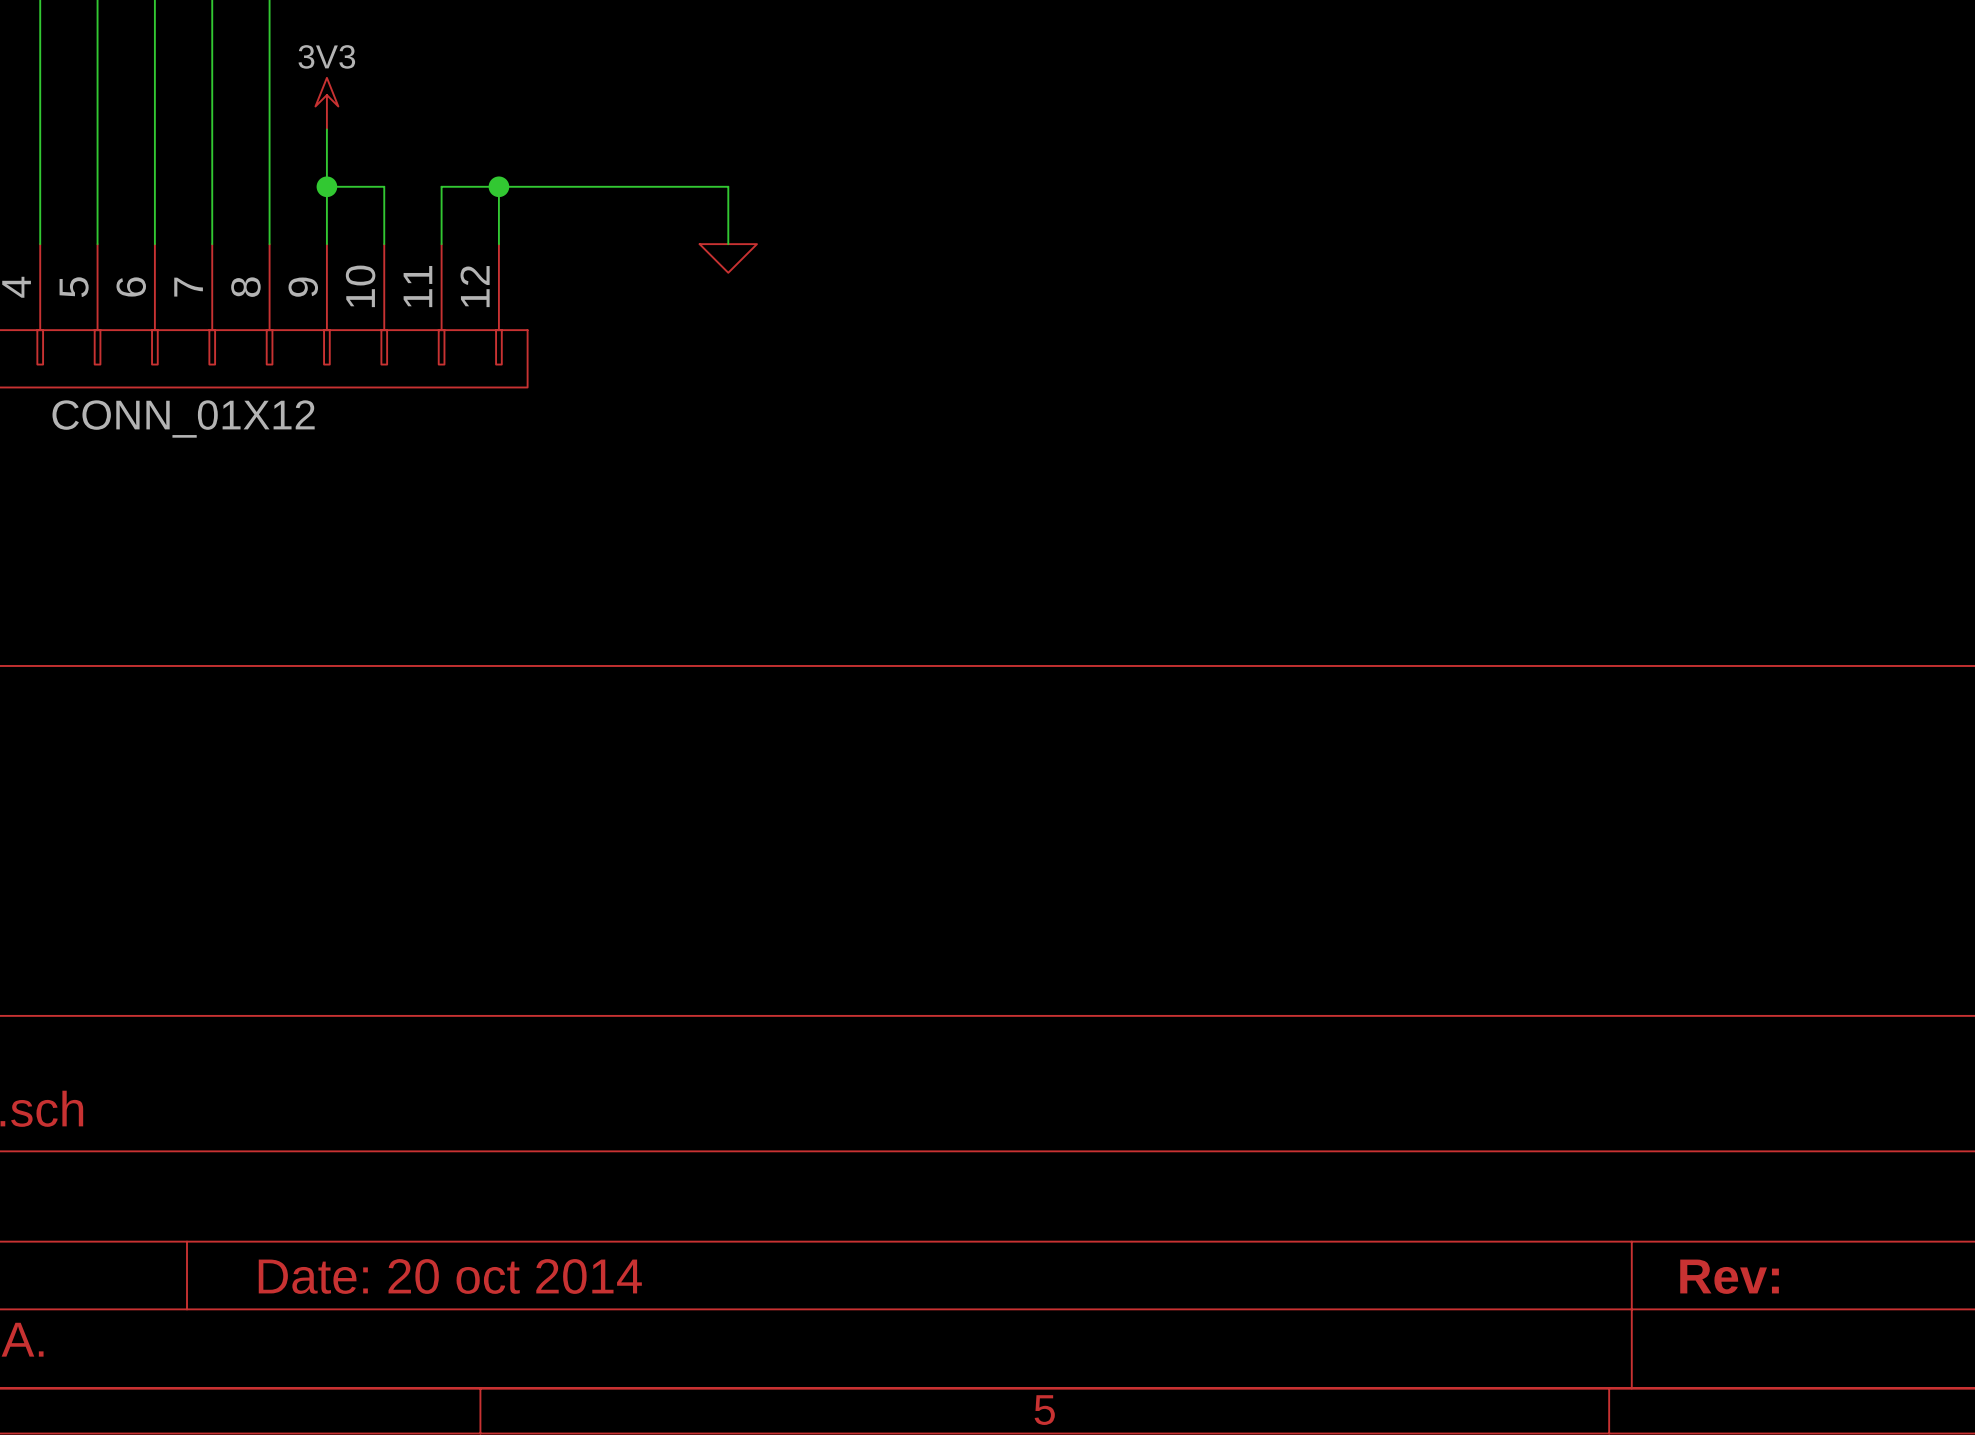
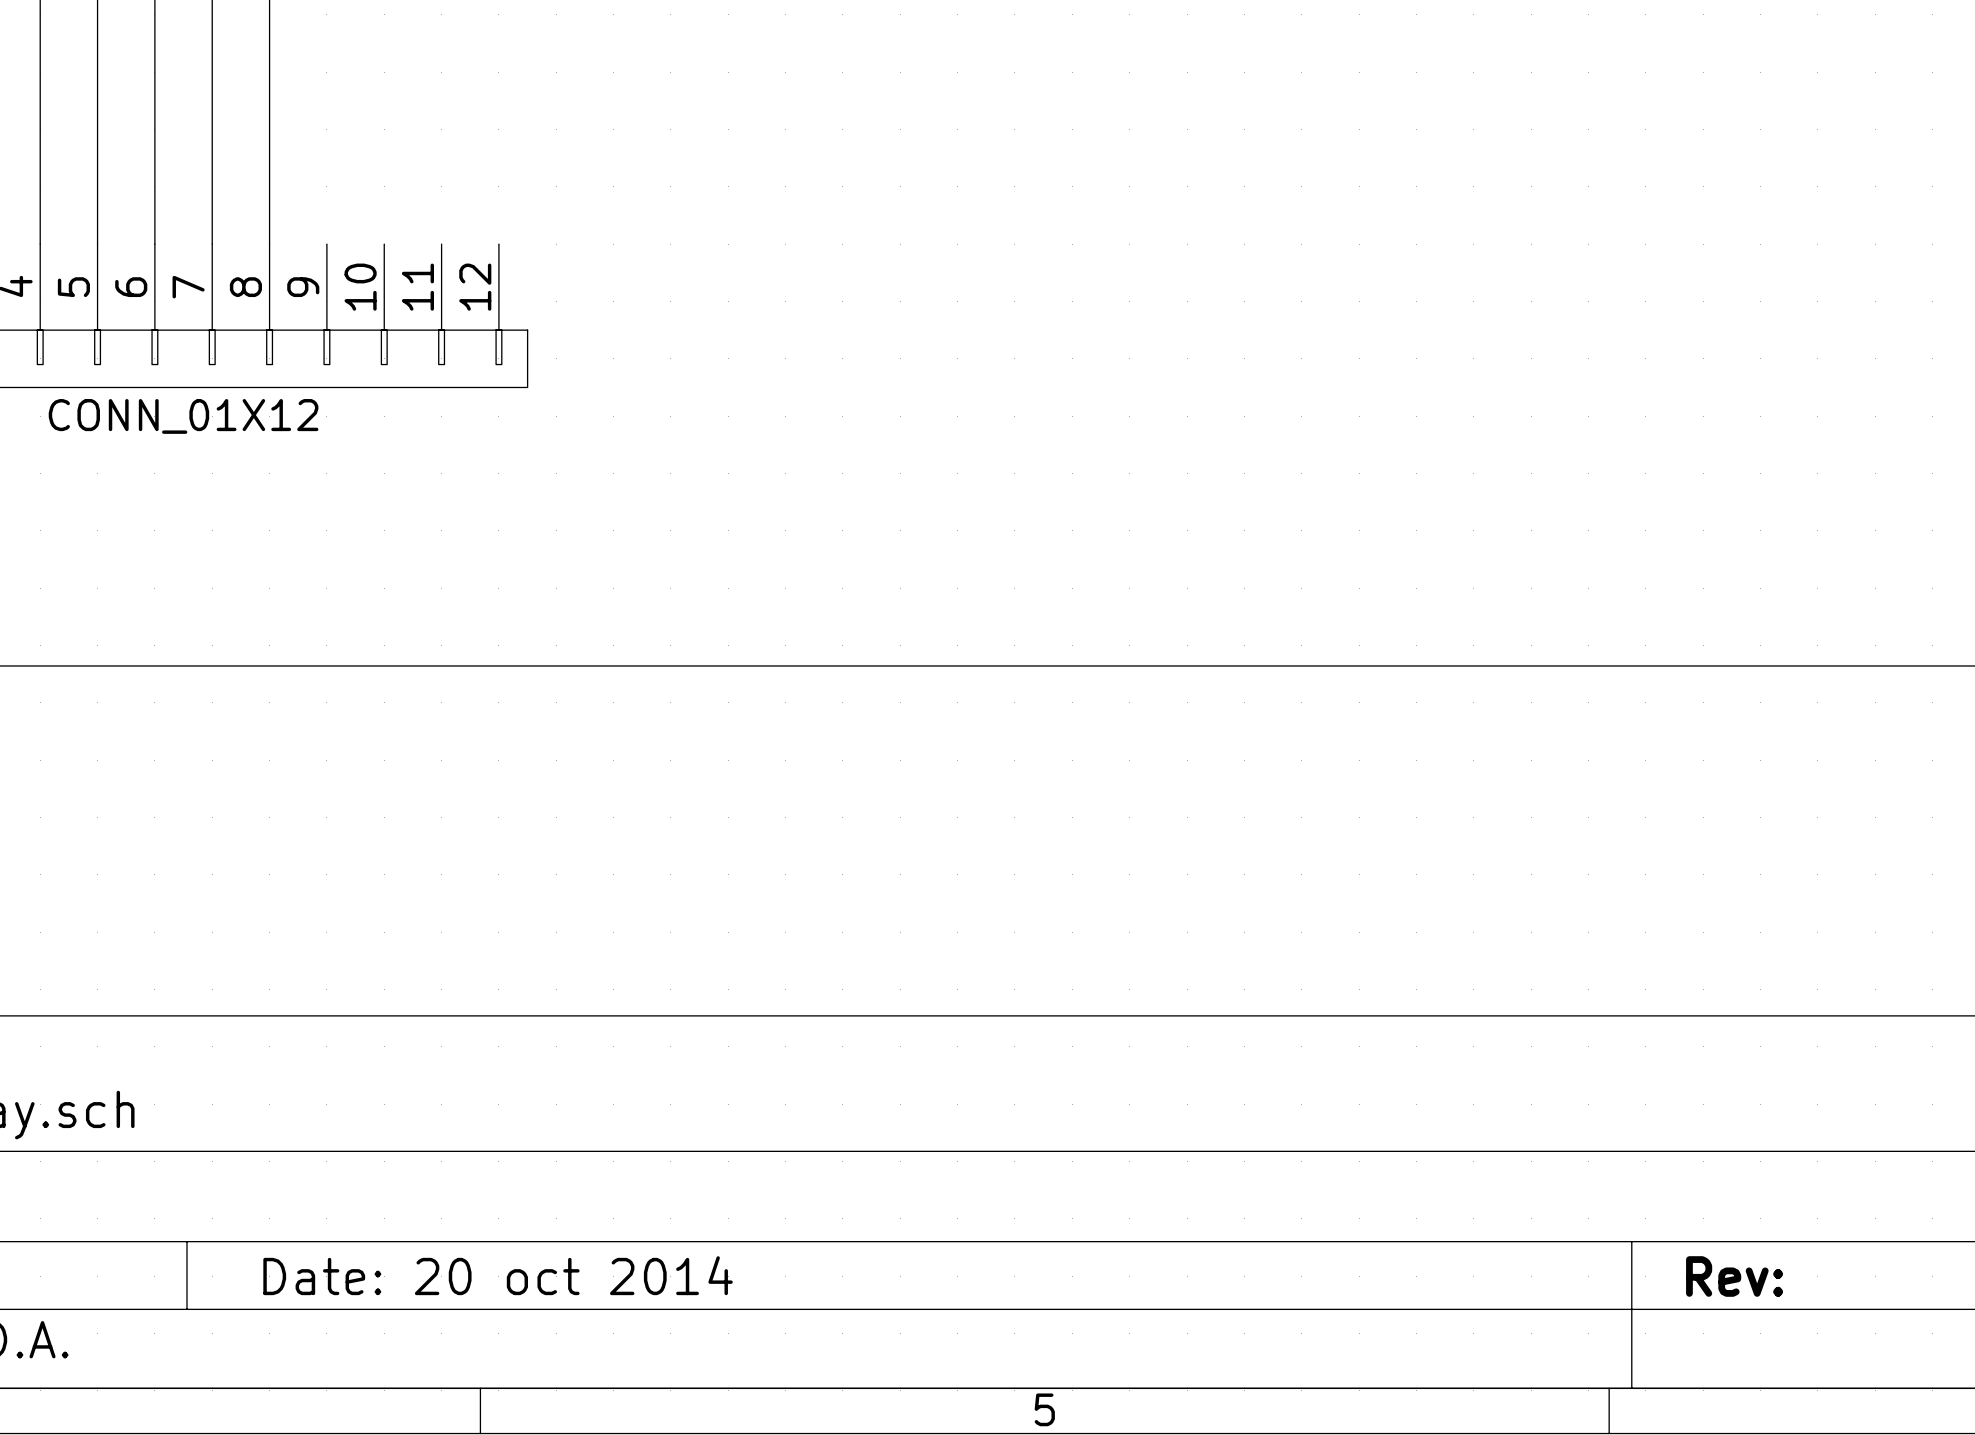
power symbol: 3V3 (326, 103) -> none
wire: (326, 129) (326, 244) -> none
wire: (326, 186) (384, 186) (384, 244) -> none
junction: (326, 186) -> none
wire: (498, 186) (498, 244) -> none
junction: (498, 186) -> none
wire: (441, 244) (441, 186) (728, 186) (728, 244) -> none
power symbol: (728, 258) -> none

